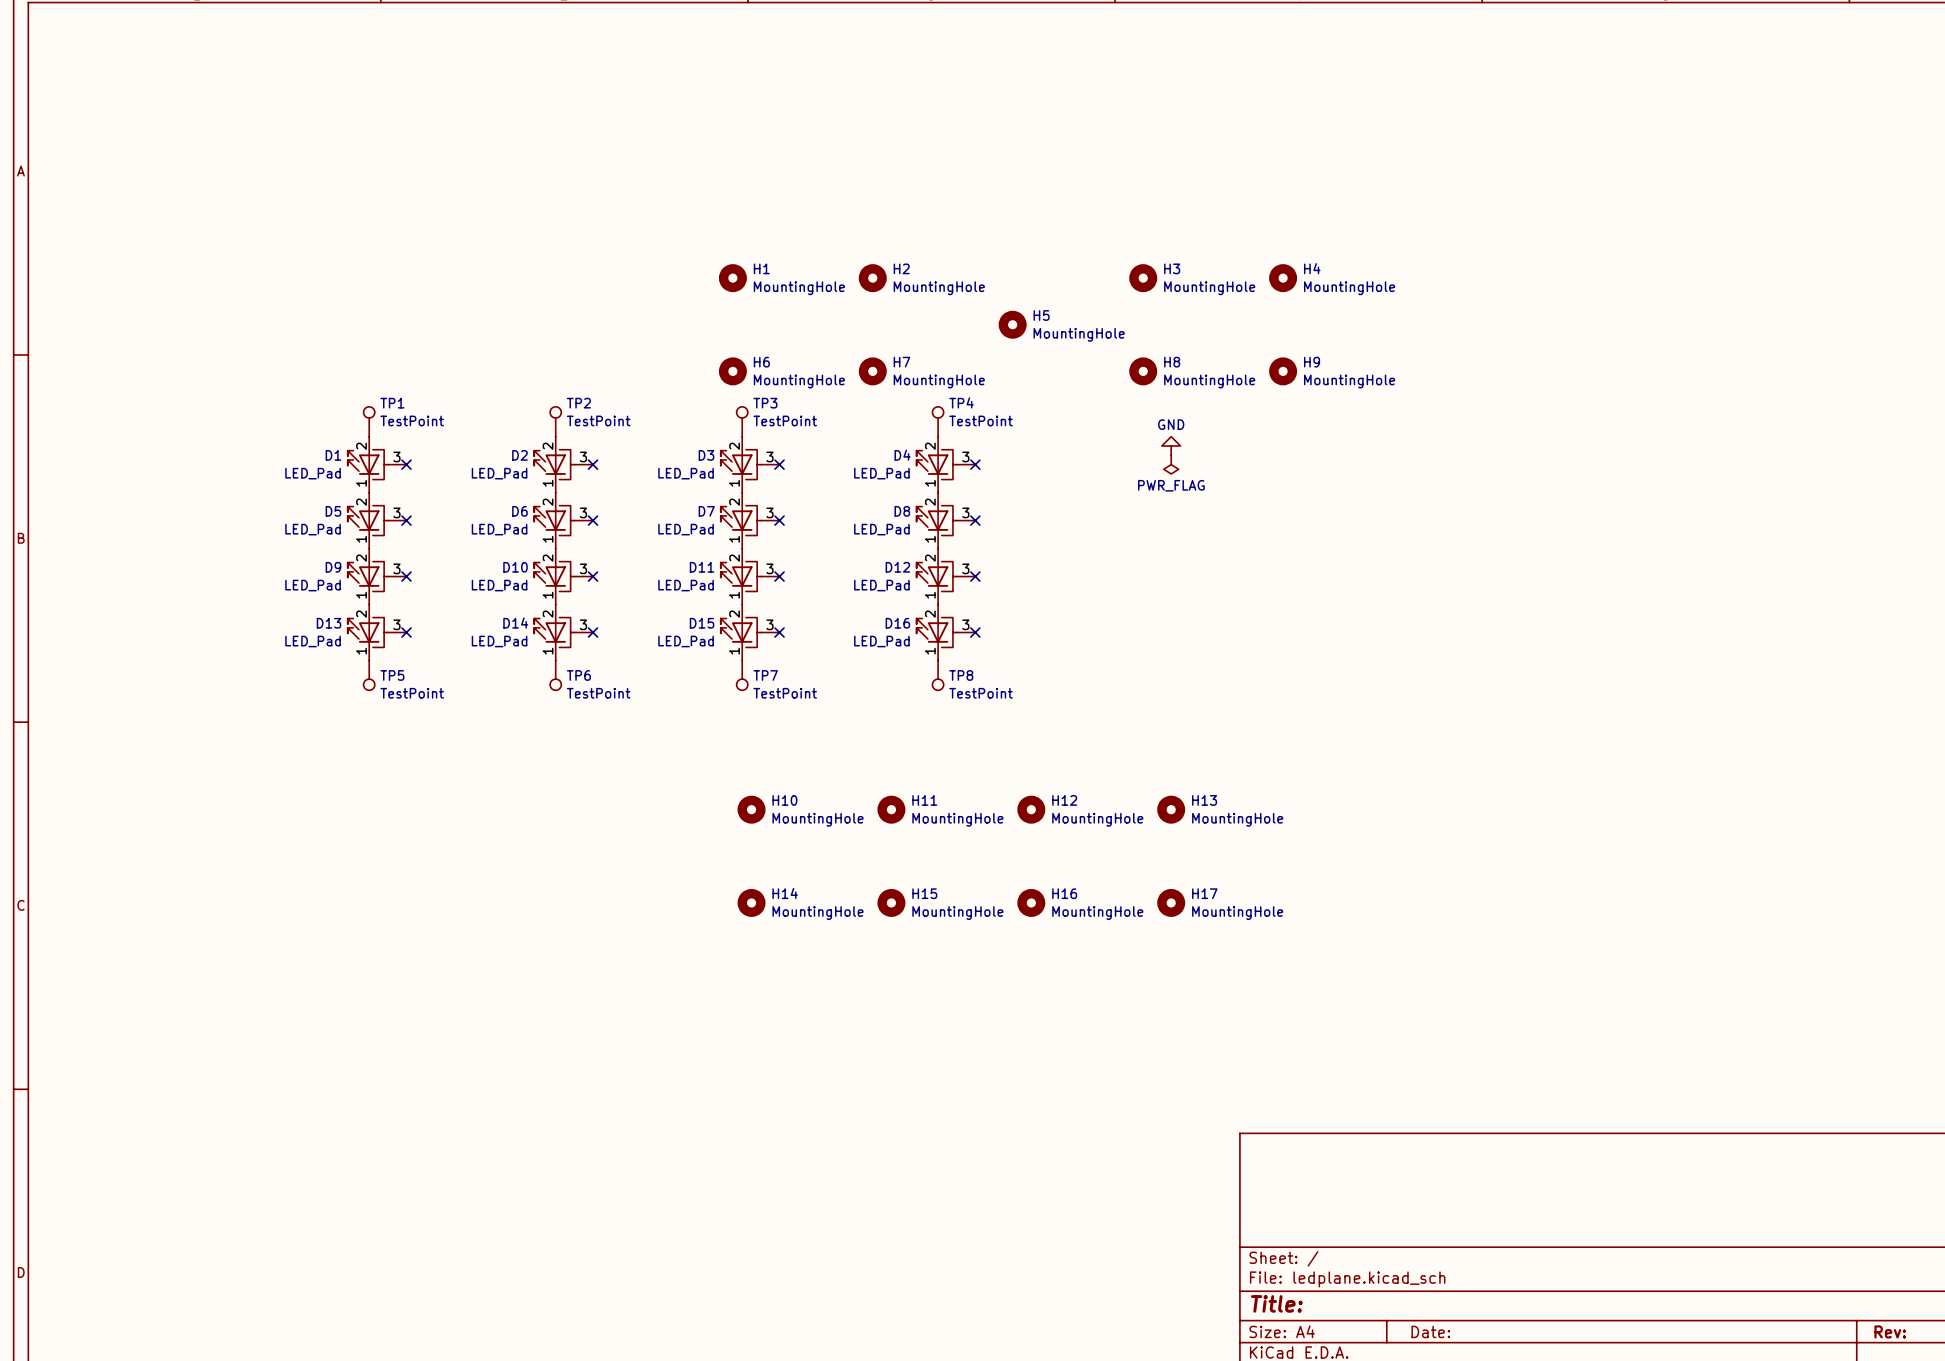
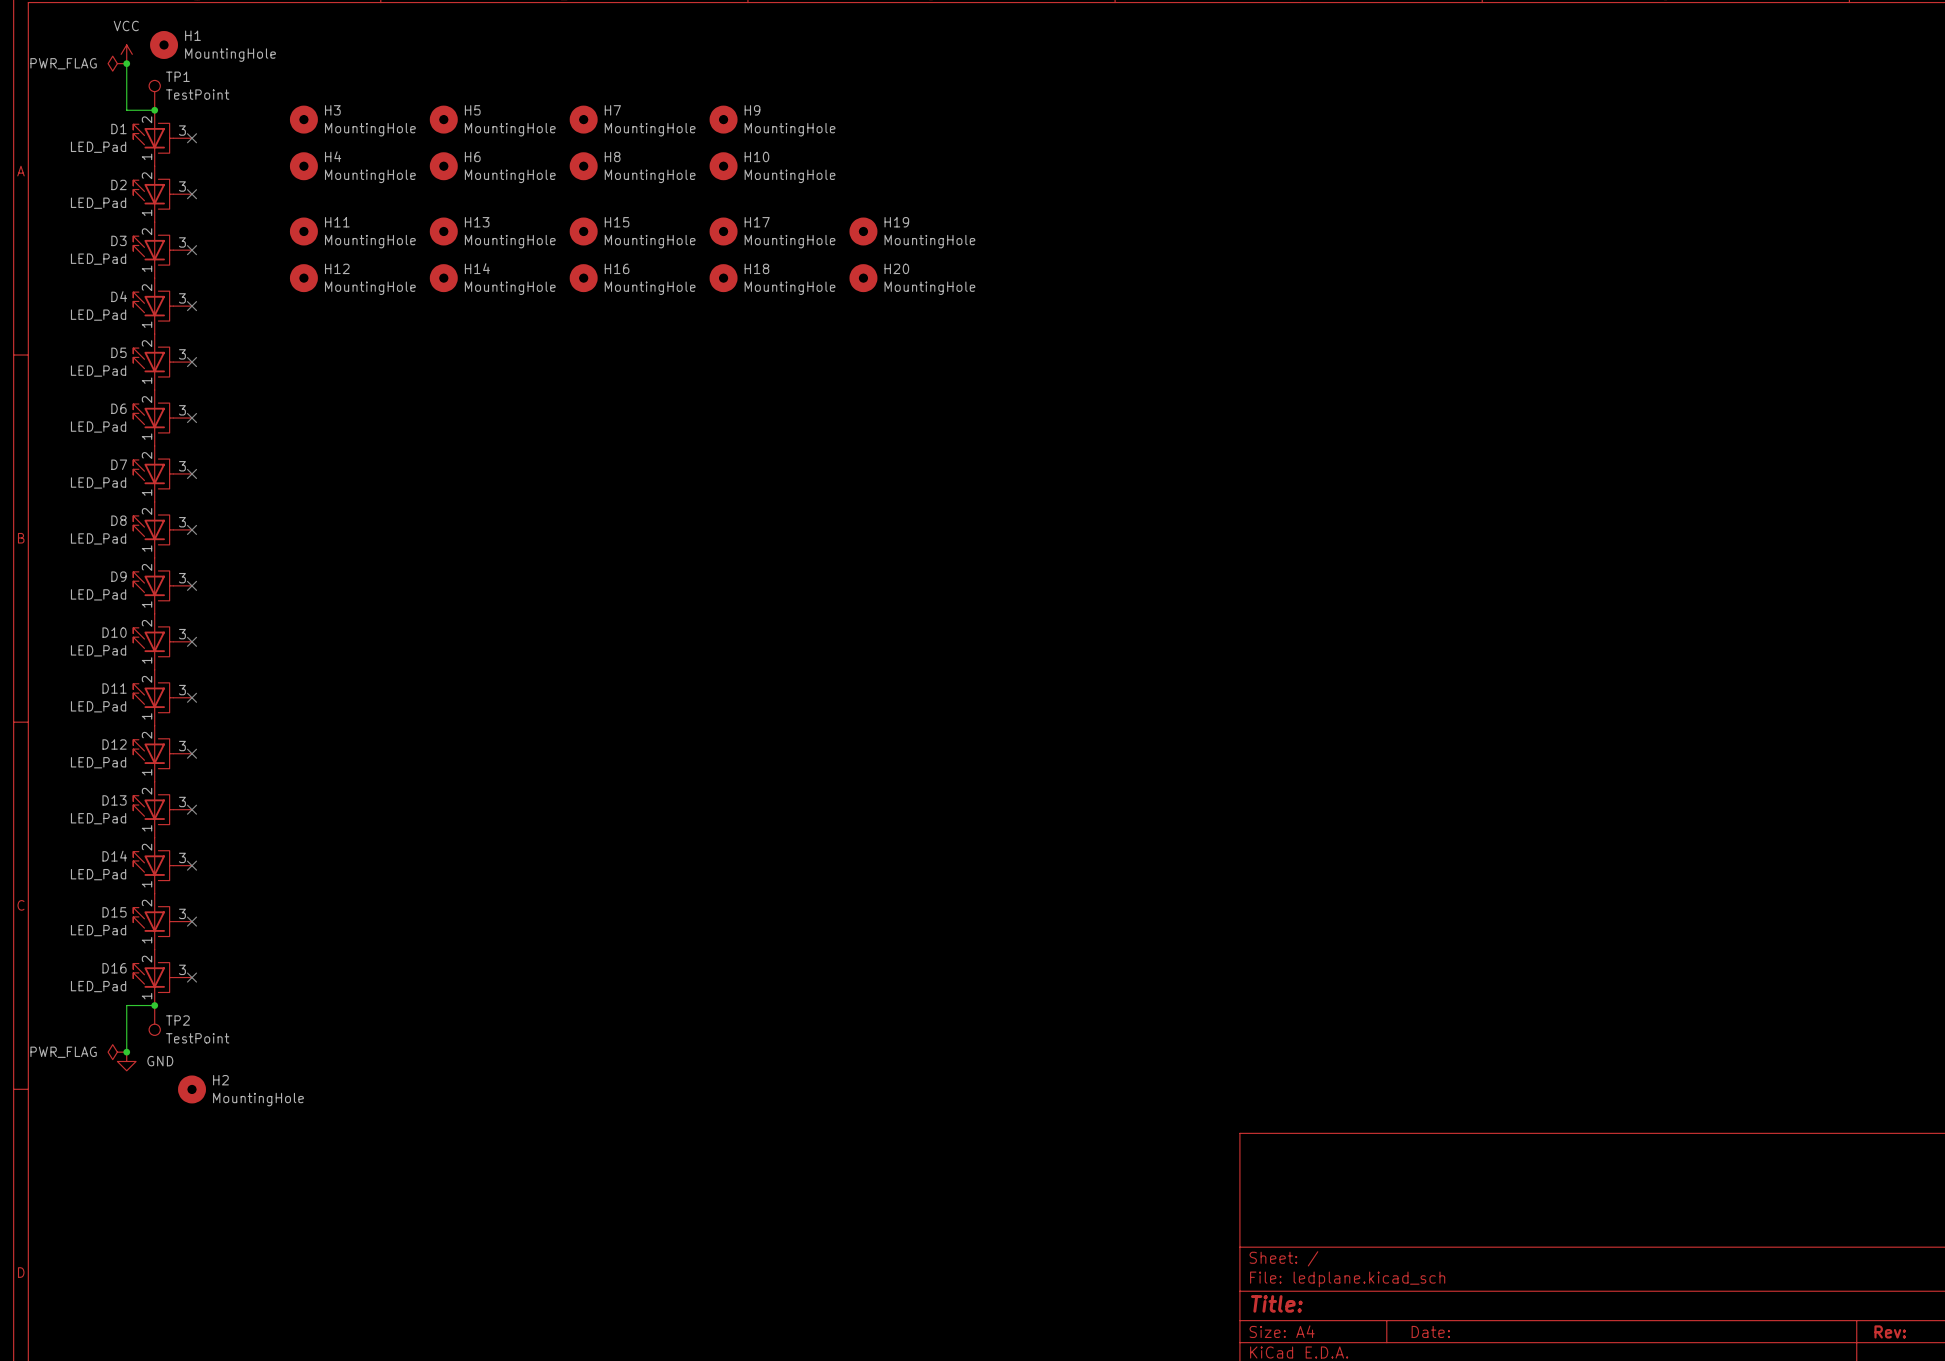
power symbol: none -> VCC (126, 54)
power symbol: none -> PWR_FLAG (117, 63)
wire: none -> (126, 63) (126, 110) (154, 110)
junction: none -> (126, 63)
junction: none -> (154, 110)
no-connect mark: none -> (192, 138)
no-connect mark: none -> (192, 194)
H19: none -> MountingHole (863, 231)
no-connect mark: none -> (192, 250)
H18: none -> MountingHole (723, 278)
H1 position: (732, 278) -> (164, 44)
H20: none -> MountingHole (863, 278)
H2 position: (872, 278) -> (192, 1089)
H3 position: (1143, 278) -> (303, 119)
H4 position: (1283, 278) -> (303, 166)
no-connect mark: none -> (192, 306)
H5 position: (1012, 324) -> (443, 119)
no-connect mark: none -> (192, 362)
H6 position: (732, 371) -> (443, 166)
H7 position: (872, 371) -> (583, 119)
H8 position: (1143, 371) -> (583, 166)
H9 position: (1283, 371) -> (723, 119)
TP2 name position: TP2 (578, 403) -> TP2 (177, 1020)
TP2 rotation: 0° (555, 412) -> 180° (154, 1029)
no-connect mark: none -> (192, 418)
TP2 value position: TestPoint (598, 420) -> TestPoint (197, 1038)
TP1 position: (369, 421) -> (154, 95)
TP2 position: (555, 421) -> (154, 1020)
TP3: TestPoint (742, 421) -> none
TP4: TestPoint (938, 421) -> none
power symbol: GND (1171, 445) -> none
D1 position: (377, 464) -> (162, 138)
no-connect mark: (406, 464) -> none
D2 position: (563, 464) -> (162, 194)
no-connect mark: (593, 464) -> none
D3 position: (750, 464) -> (162, 250)
no-connect mark: (779, 464) -> none
D4 position: (945, 464) -> (162, 306)
no-connect mark: (975, 464) -> none
power symbol: PWR_FLAG (1171, 464) -> none
no-connect mark: none -> (192, 473)
D5 position: (377, 520) -> (162, 362)
no-connect mark: (406, 520) -> none
D6 position: (563, 520) -> (162, 418)
no-connect mark: (593, 520) -> none
D7 position: (750, 520) -> (162, 473)
no-connect mark: (779, 520) -> none
D8 position: (945, 520) -> (162, 529)
no-connect mark: (975, 520) -> none
no-connect mark: none -> (192, 529)
D9 position: (377, 576) -> (162, 585)
no-connect mark: (406, 576) -> none
D10 position: (563, 576) -> (162, 641)
no-connect mark: (593, 576) -> none
D11 position: (750, 576) -> (162, 697)
no-connect mark: (779, 576) -> none
D12 position: (945, 576) -> (162, 753)
no-connect mark: (975, 576) -> none
no-connect mark: none -> (192, 585)
D13 position: (377, 632) -> (162, 809)
no-connect mark: (406, 632) -> none
D14 position: (563, 632) -> (162, 865)
no-connect mark: (593, 632) -> none
D15 position: (750, 632) -> (162, 921)
no-connect mark: (779, 632) -> none
D16 position: (945, 632) -> (162, 977)
no-connect mark: (975, 632) -> none
no-connect mark: none -> (192, 641)
TP5: TestPoint (369, 675) -> none
TP6: TestPoint (555, 675) -> none
TP7: TestPoint (742, 675) -> none
TP8: TestPoint (938, 675) -> none
no-connect mark: none -> (192, 697)
no-connect mark: none -> (192, 753)
no-connect mark: none -> (192, 809)
H10 position: (751, 809) -> (723, 166)
H11 position: (891, 809) -> (303, 231)
H12 position: (1031, 809) -> (303, 278)
H13 position: (1171, 809) -> (443, 231)
no-connect mark: none -> (192, 865)
H14 position: (751, 902) -> (443, 278)
H15 position: (891, 902) -> (583, 231)
H16 position: (1031, 902) -> (583, 278)
H17 position: (1171, 902) -> (723, 231)
no-connect mark: none -> (192, 921)
no-connect mark: none -> (192, 977)
wire: none -> (154, 1005) (126, 1005) (126, 1052)
junction: none -> (154, 1005)
power symbol: none -> PWR_FLAG (117, 1052)
junction: none -> (126, 1052)
power symbol: none -> GND (126, 1061)

